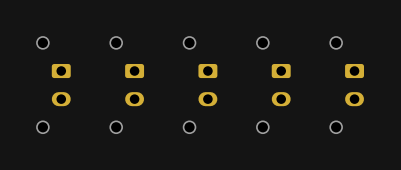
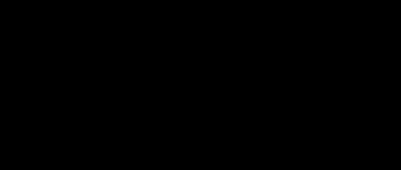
part: (53, 85) -> none
part: (127, 85) -> none
part: (200, 85) -> none
part: (273, 85) -> none
part: (347, 85) -> none

